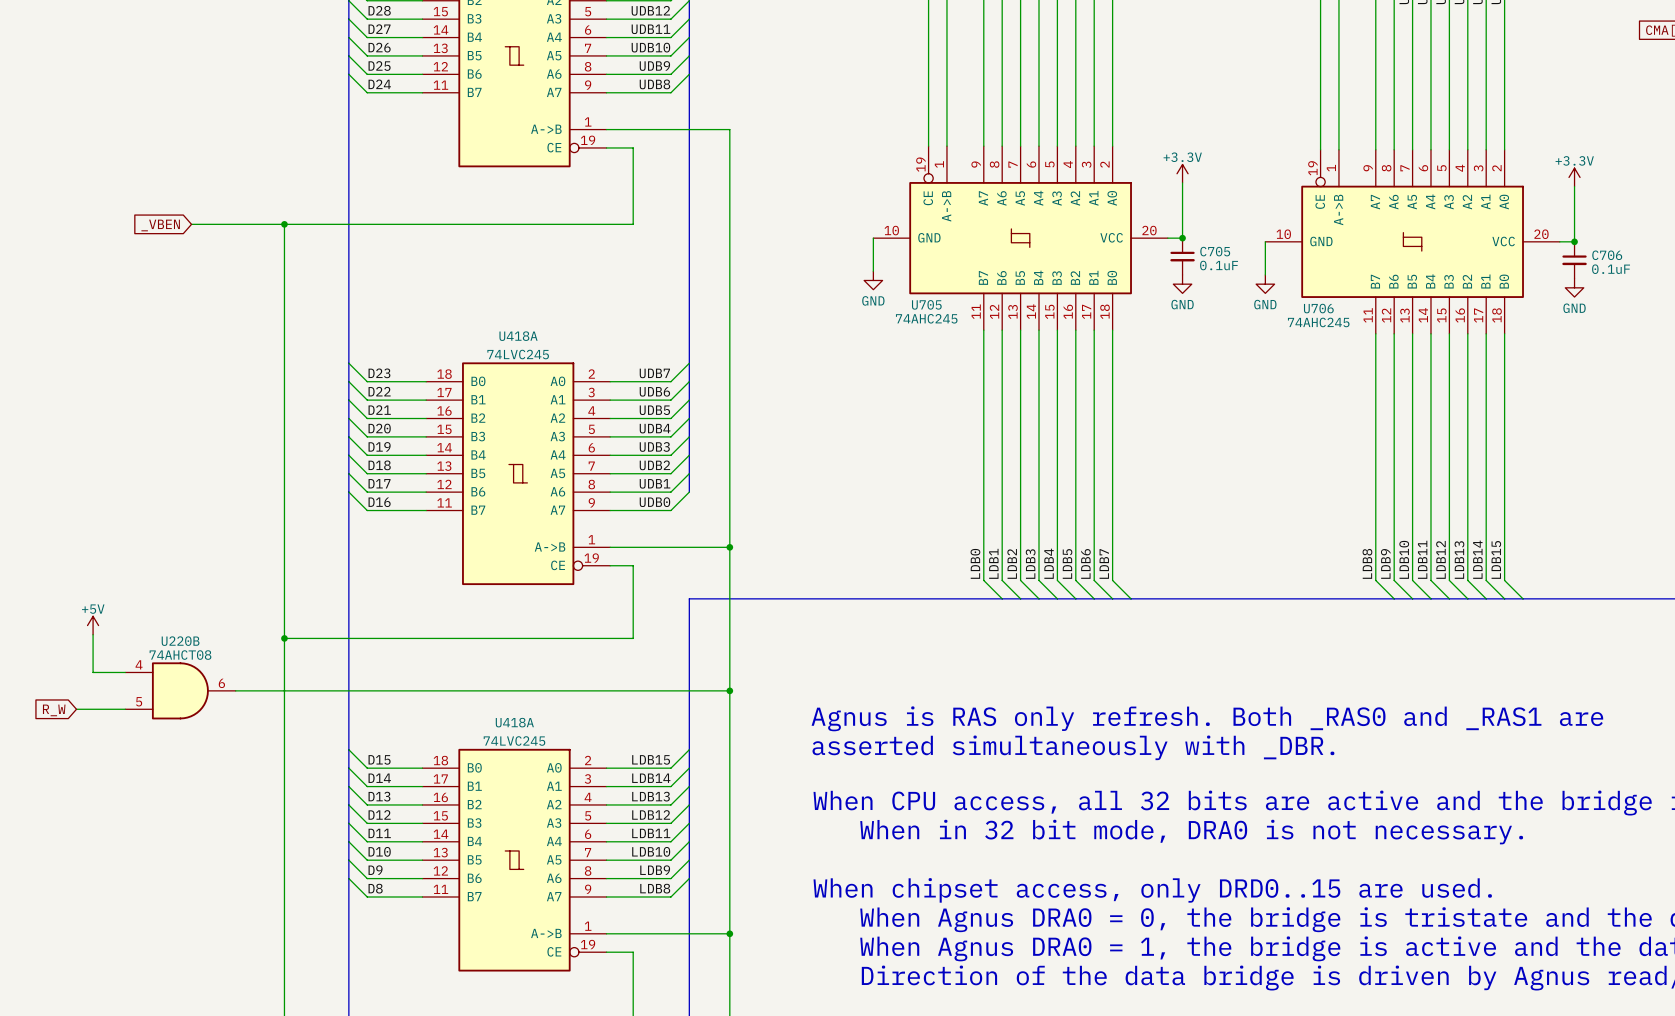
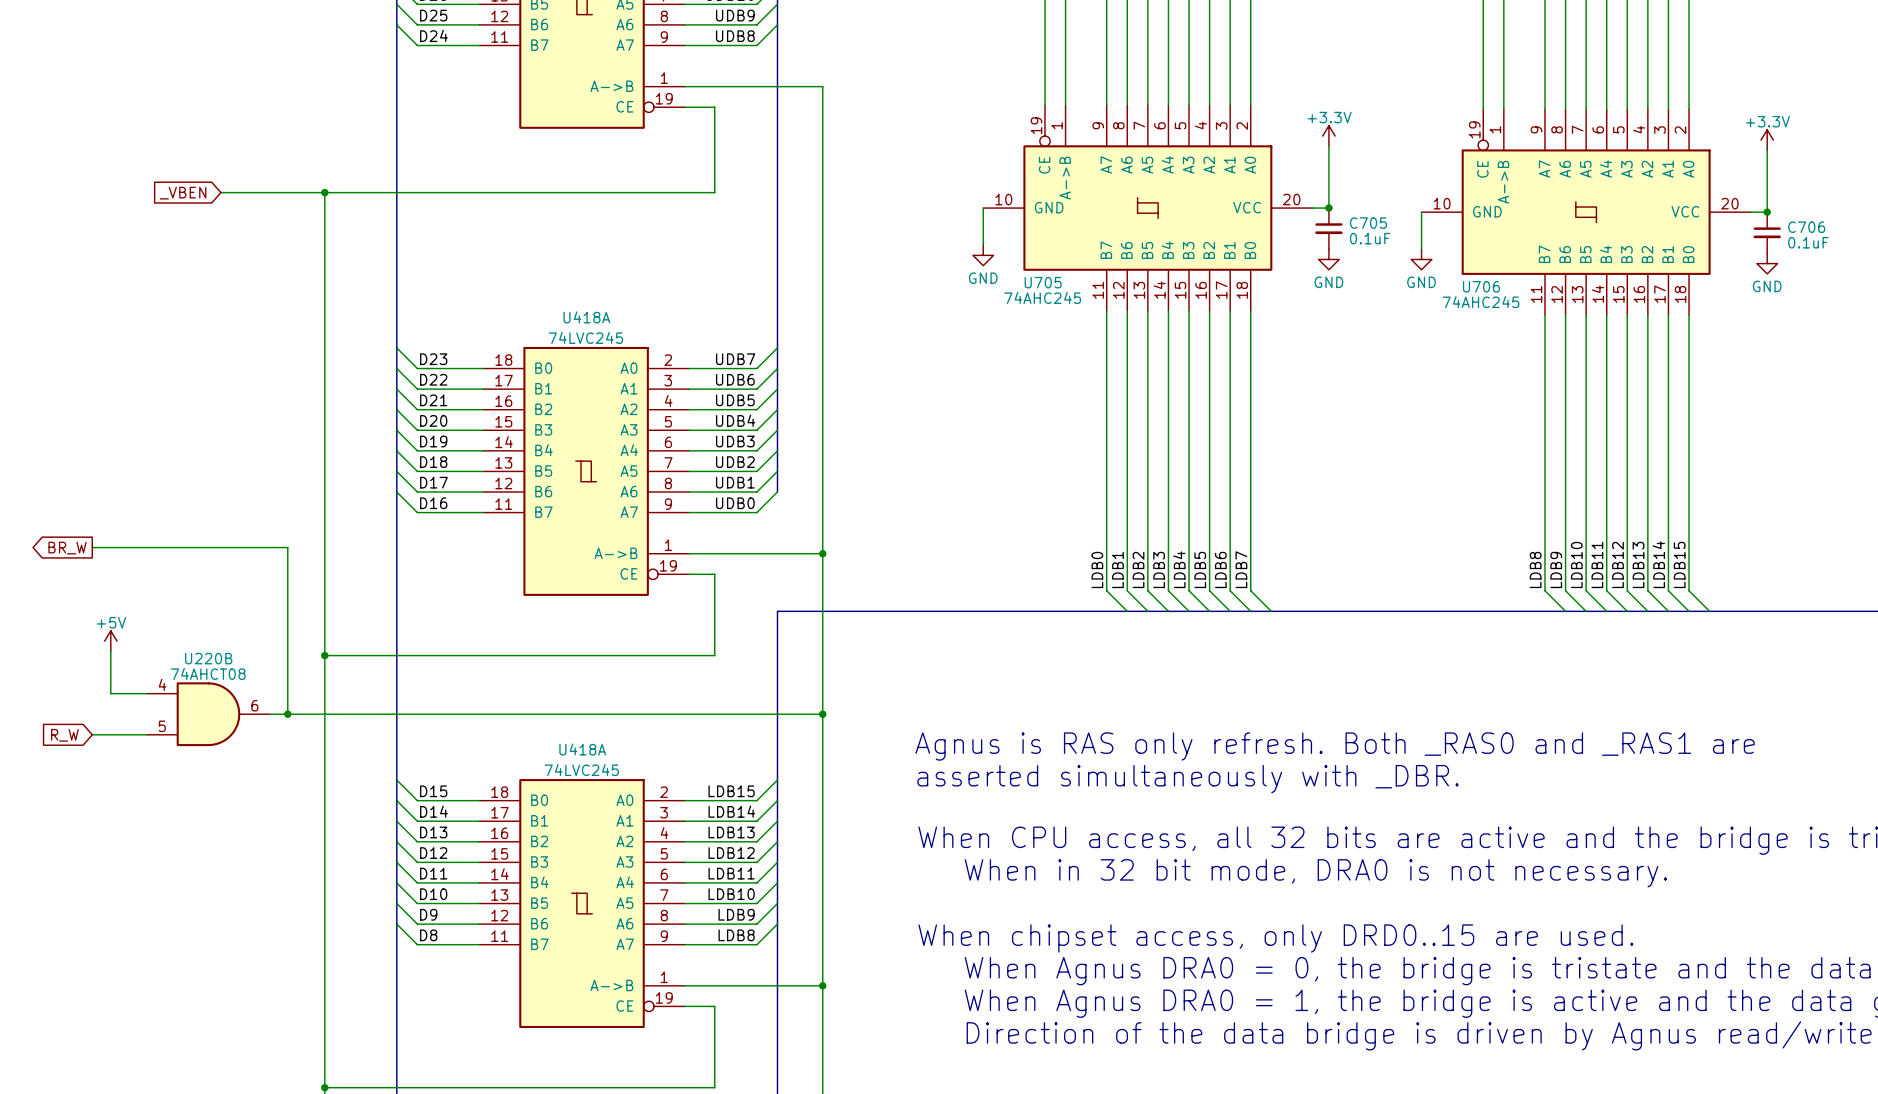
wire: none -> (92, 547) (287, 547) (287, 714)
global label: none -> BR_W (67, 548)
junction: none -> (287, 714)

